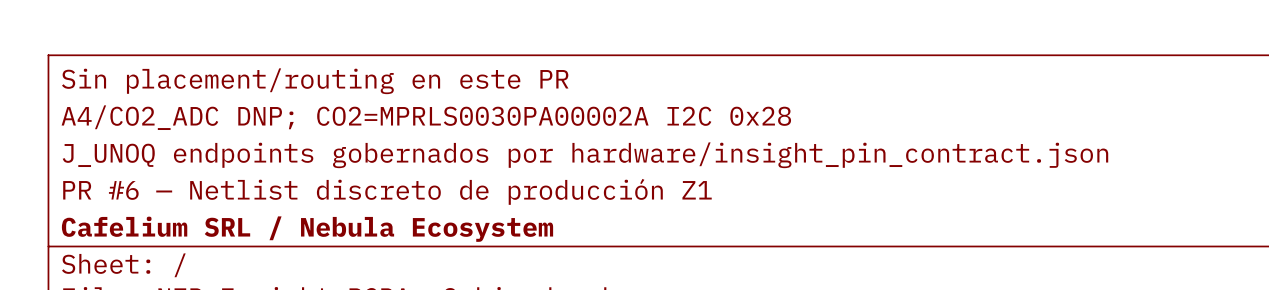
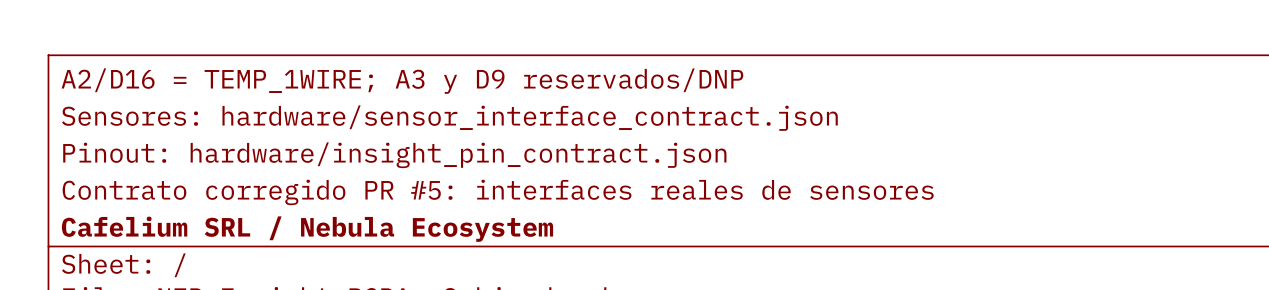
title block: Sin placement/routing en este PR (315, 81) -> A2/D16 = TEMP_1WIRE; A3 y D9 reservados/DNP (402, 81)
title block: A4/CO2_ADC DNP; CO2=MPRLS0030PA00002A I2C 0x28 (426, 117) -> Sensores: hardware/sensor_interface_contract.json (449, 118)
title block: J_UNOQ endpoints gobernados por hardware/insight_pin_contract.json (585, 155) -> Pinout: hardware/insight_pin_contract.json (394, 155)
title block: PR #6 — Netlist discreto de producción Z1 (387, 191) -> Contrato corregido PR #5: interfaces reales de sensores (498, 192)

